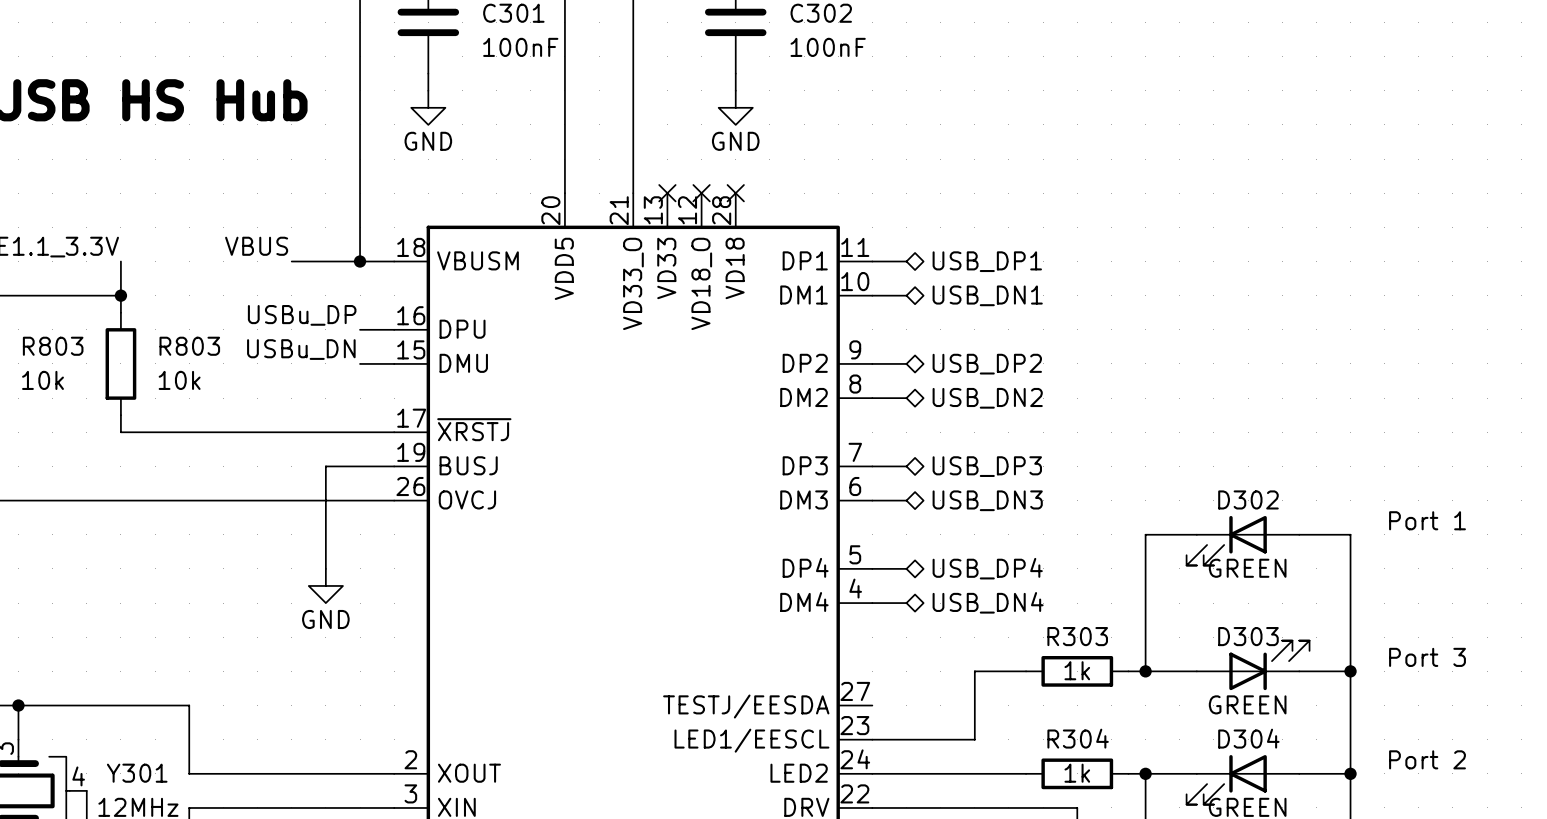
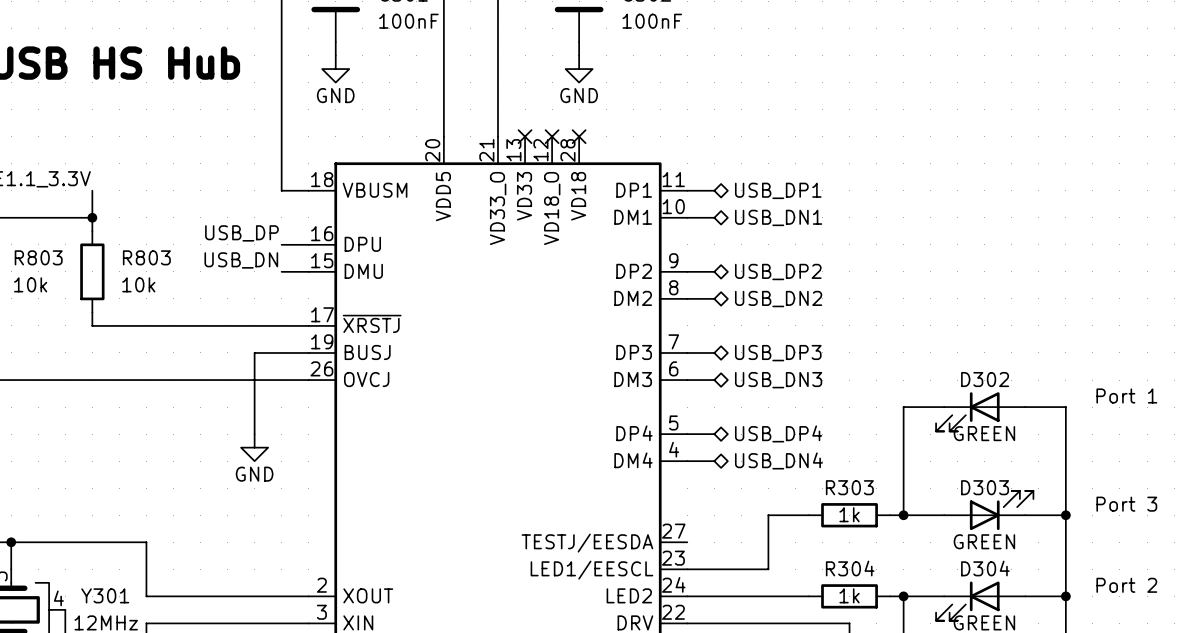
label: VBUS (256, 246) -> none
wire: (291, 261) (360, 261) -> none
junction: (360, 261) -> none
label: USBu_DP (302, 315) -> USB_DP (241, 233)
label: USBu_DN (301, 349) -> USB_DN (241, 260)

